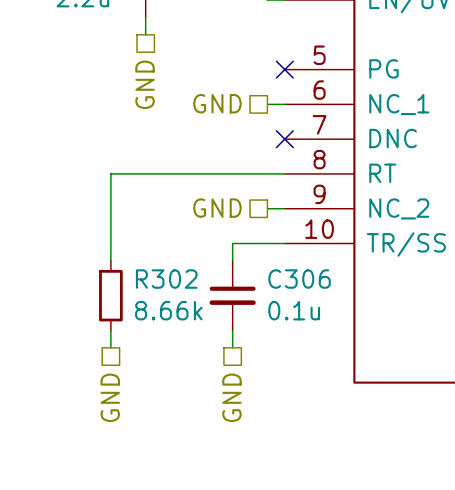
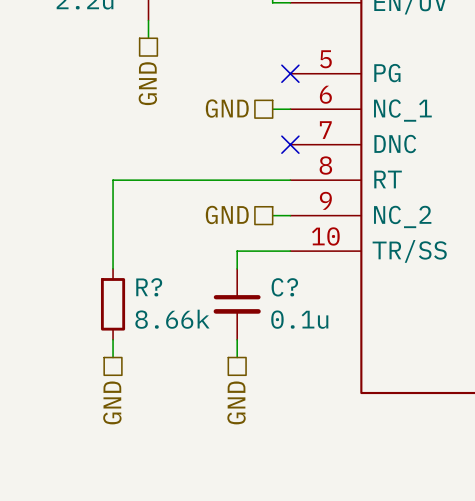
R302 name: R302 (166, 279) -> R? (149, 287)
C306 name: C306 (299, 279) -> C? (284, 287)

